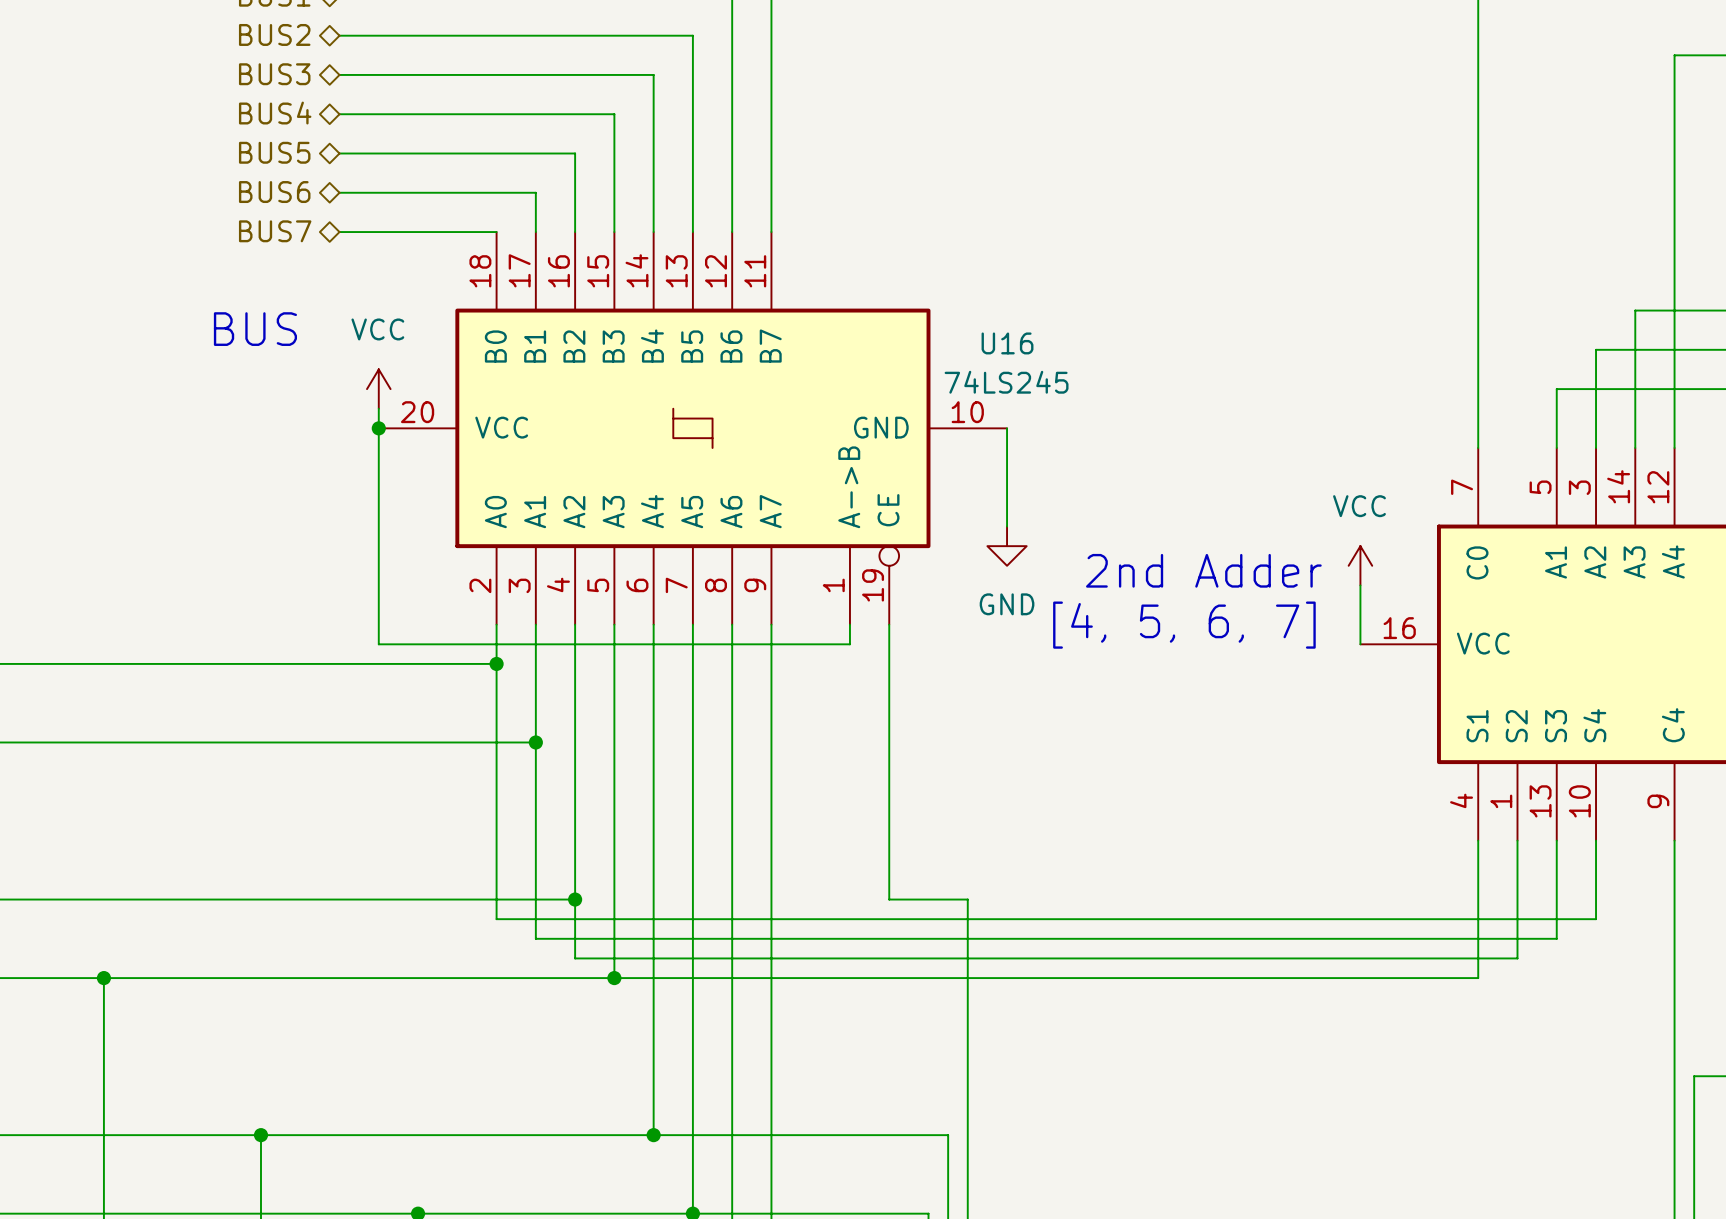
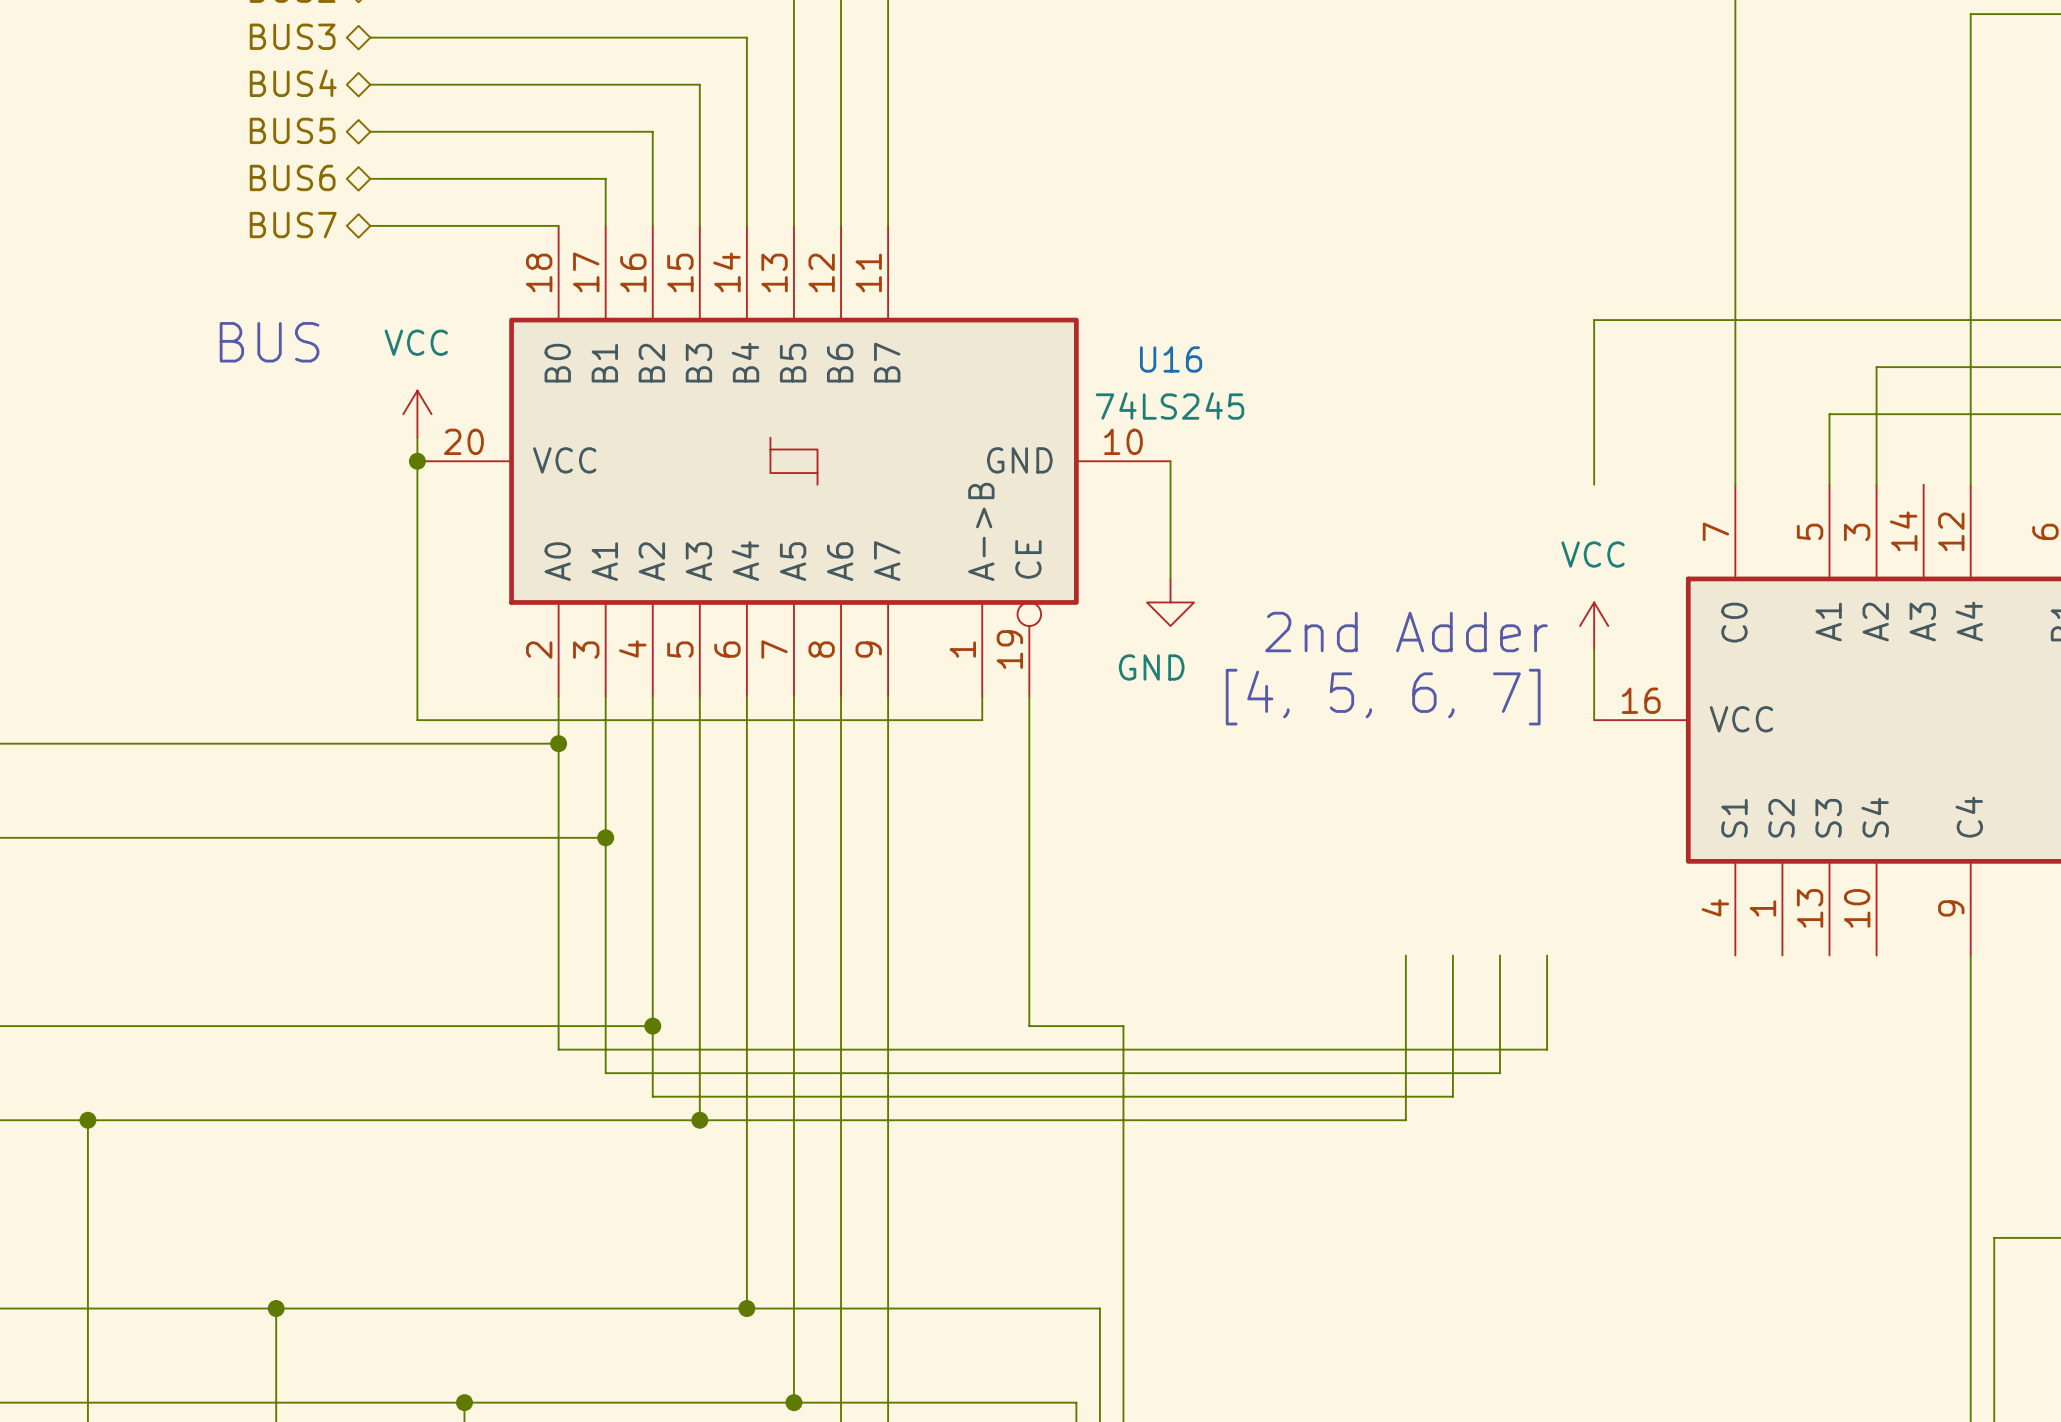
wire: (1635, 310) (1635, 447) -> (1923, 320) (1594, 320) (1594, 484)
power symbol text position: GND (1007, 604) -> GND (1151, 667)
wire: (1478, 840) (1478, 978) (1203, 978) -> (1405, 955) (1405, 1120)
wire: (1517, 840) (1517, 958) (1242, 958) -> (1452, 955) (1452, 1096)
wire: (1556, 840) (1556, 938) (1281, 938) -> (1500, 955) (1500, 1073)
wire: (1596, 840) (1596, 919) (1321, 919) -> (1547, 955) (1547, 1049)

